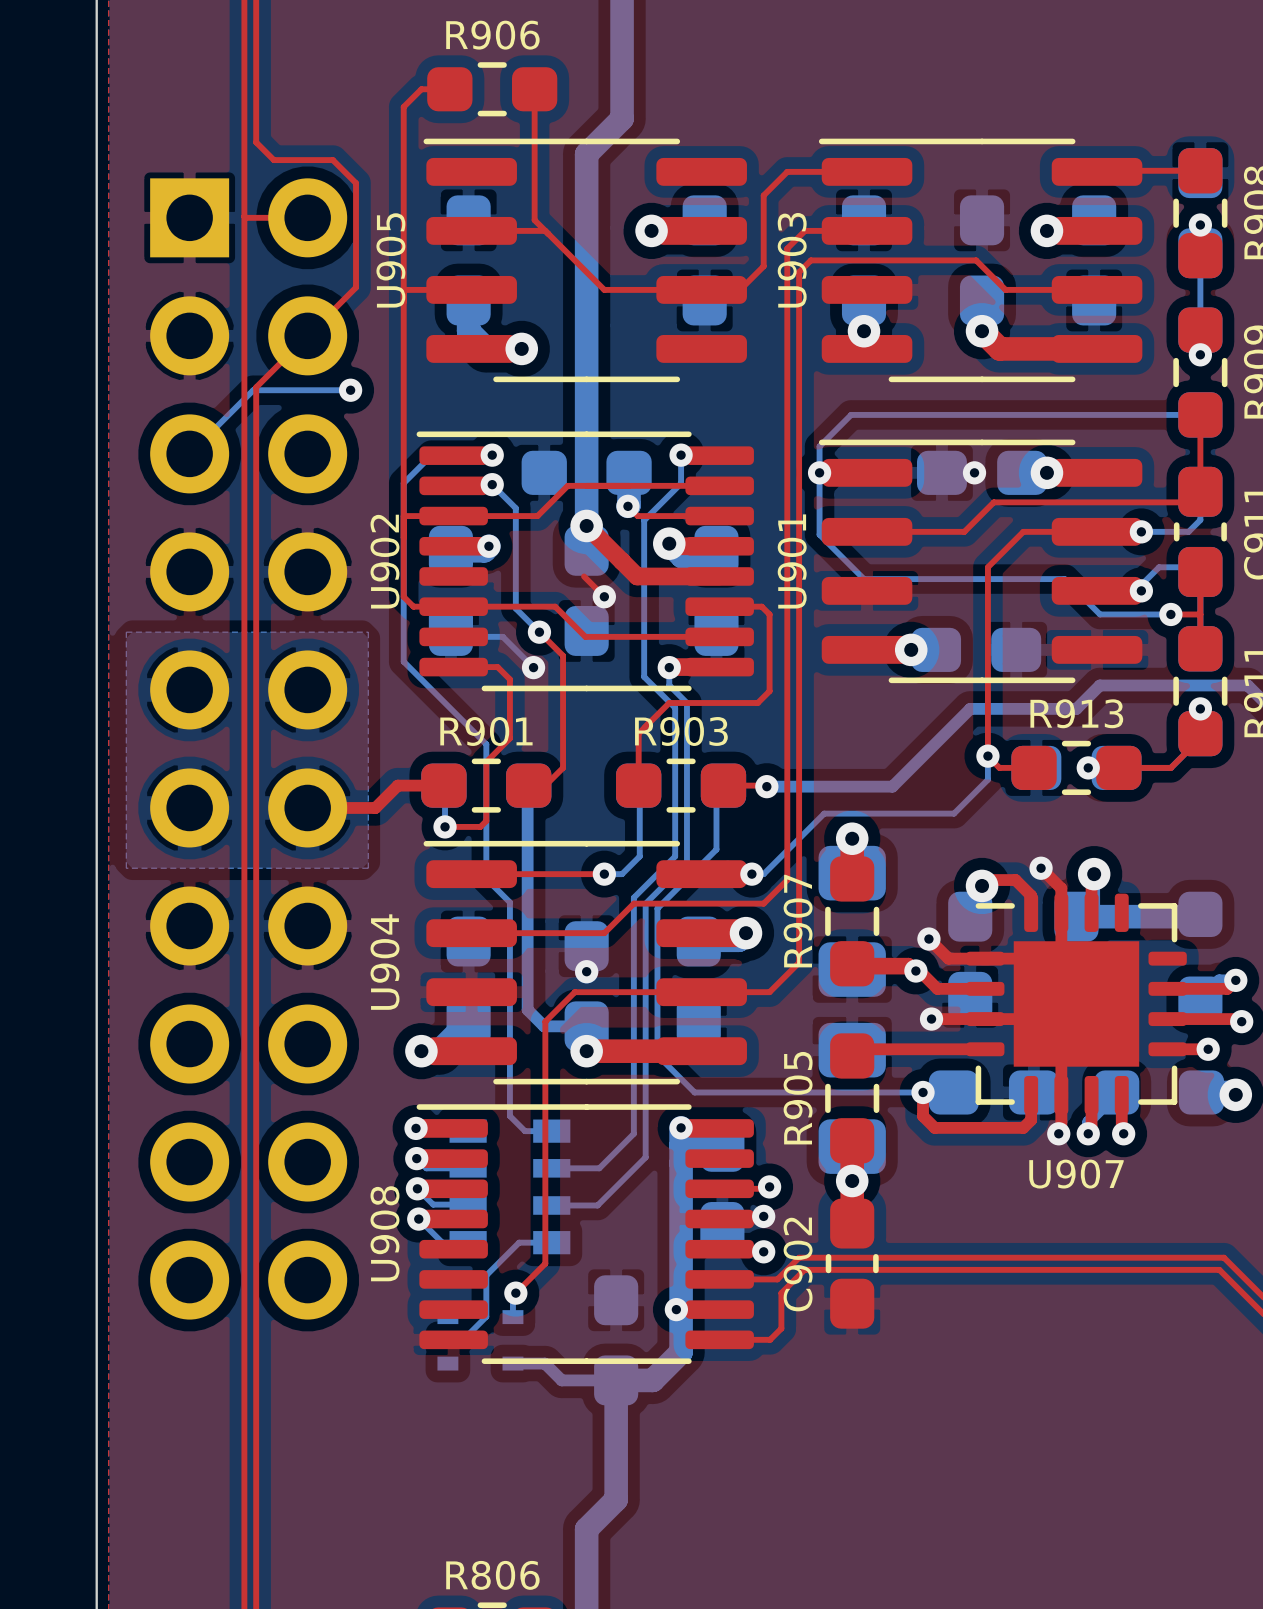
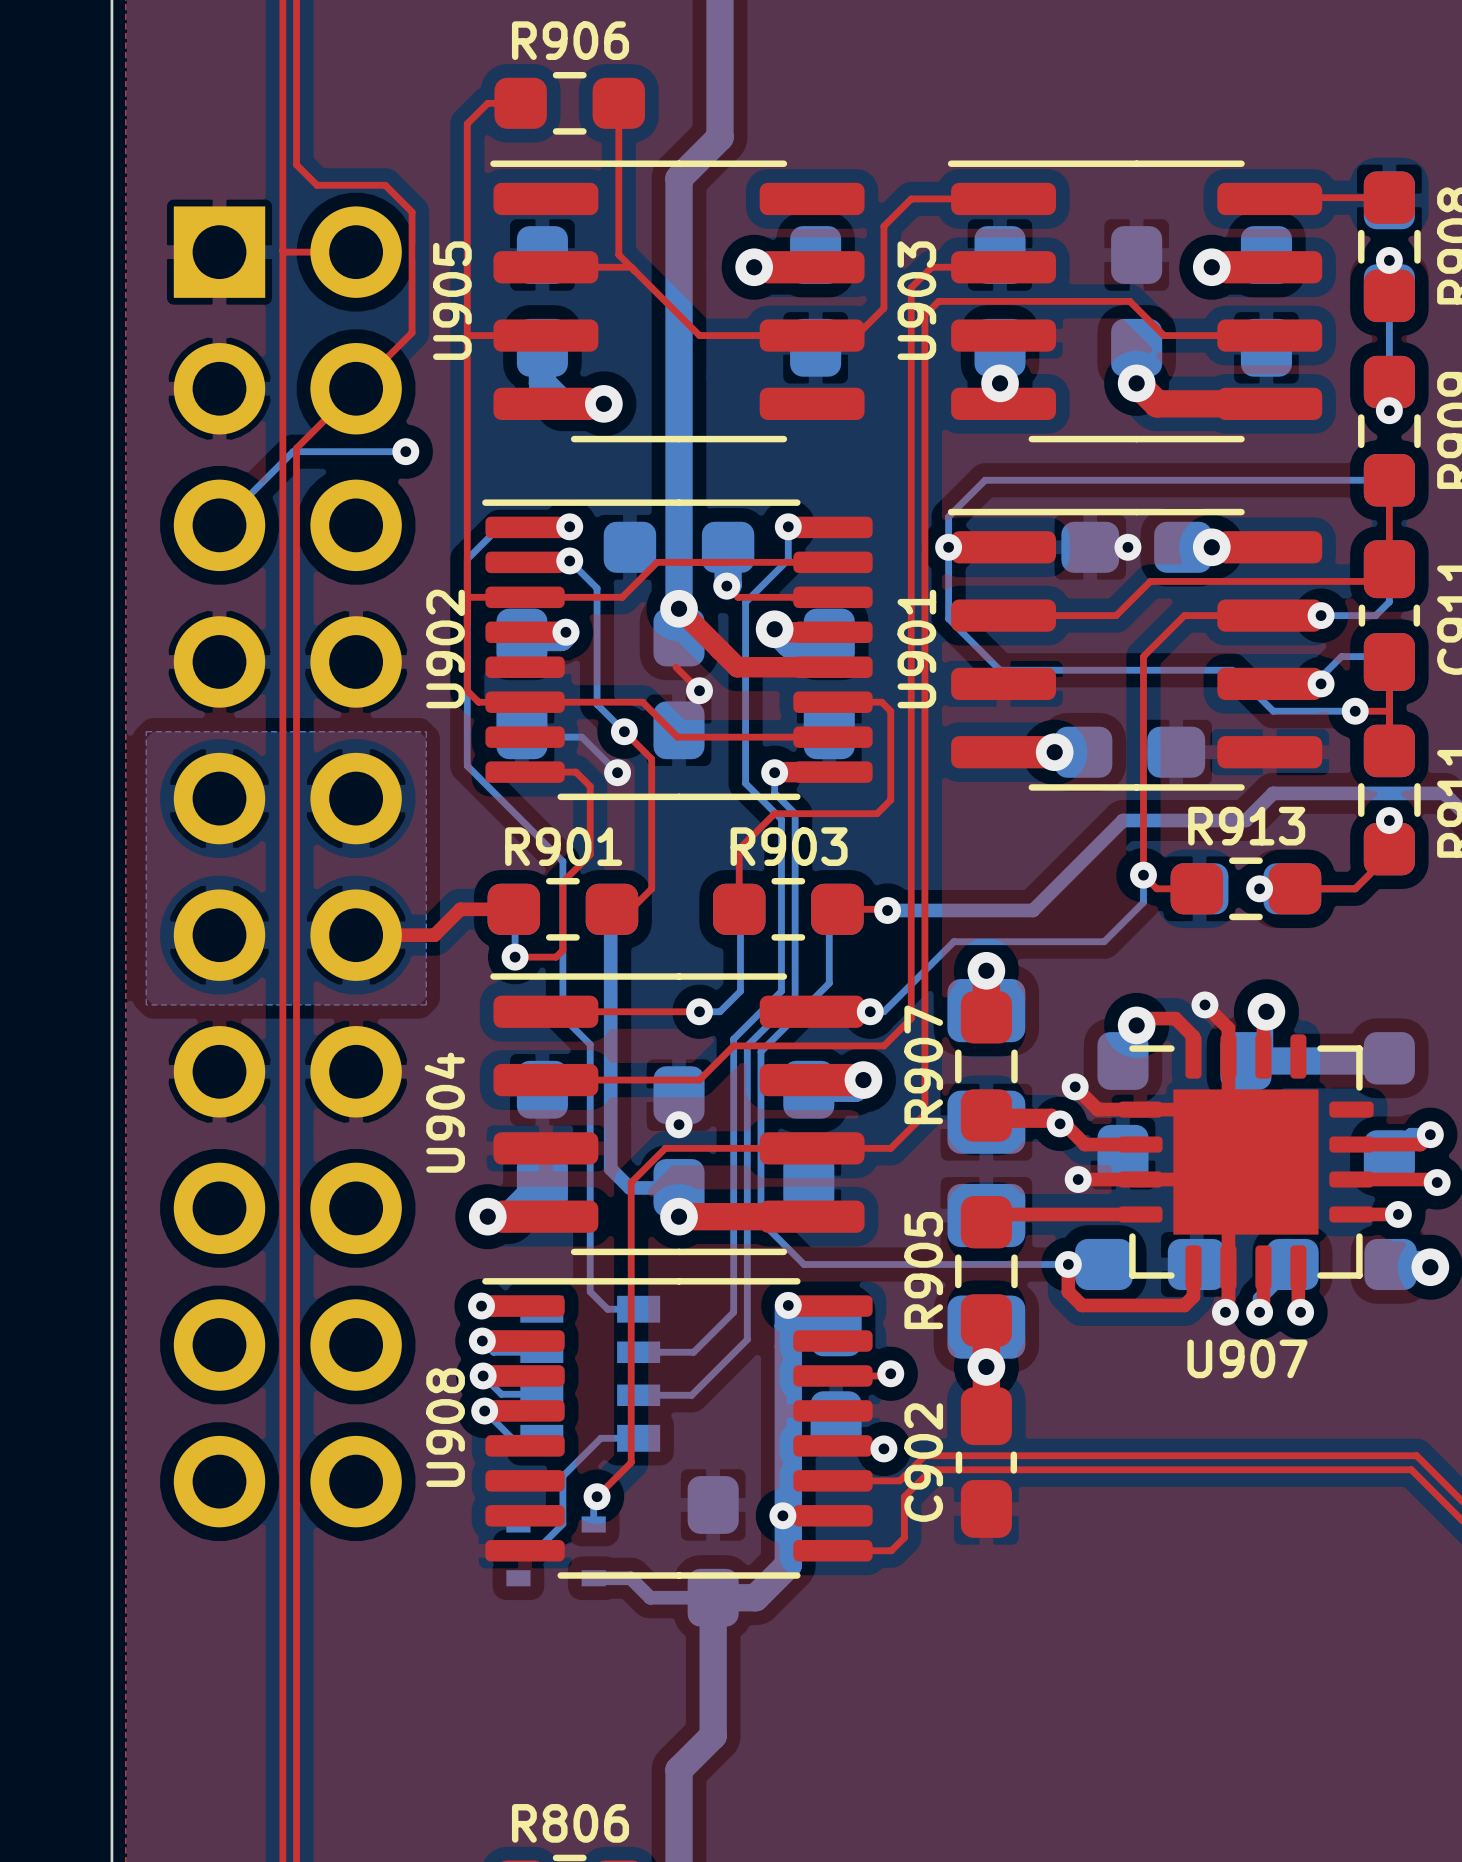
via: (763, 1216) -> none

